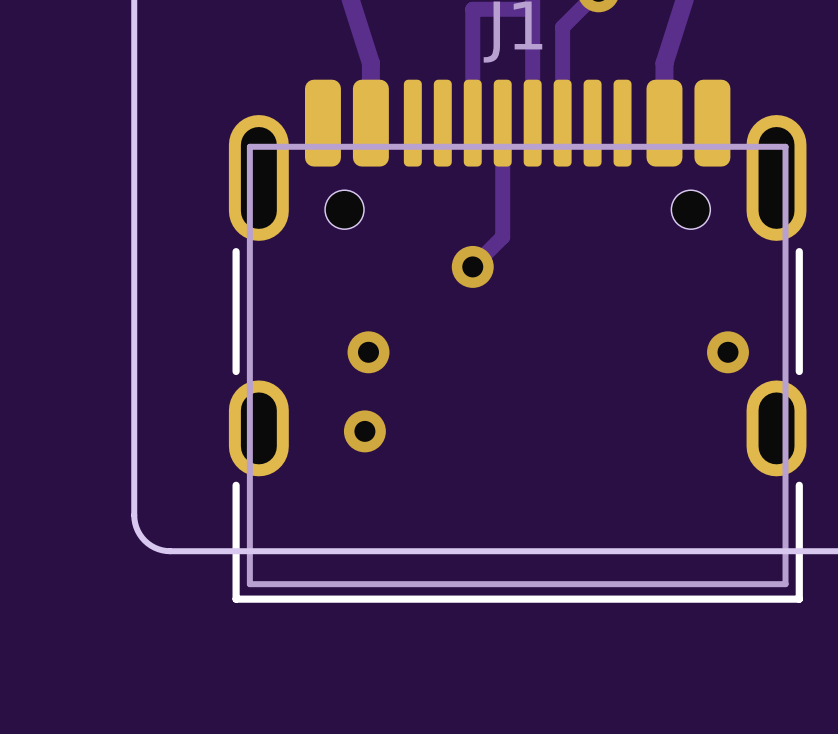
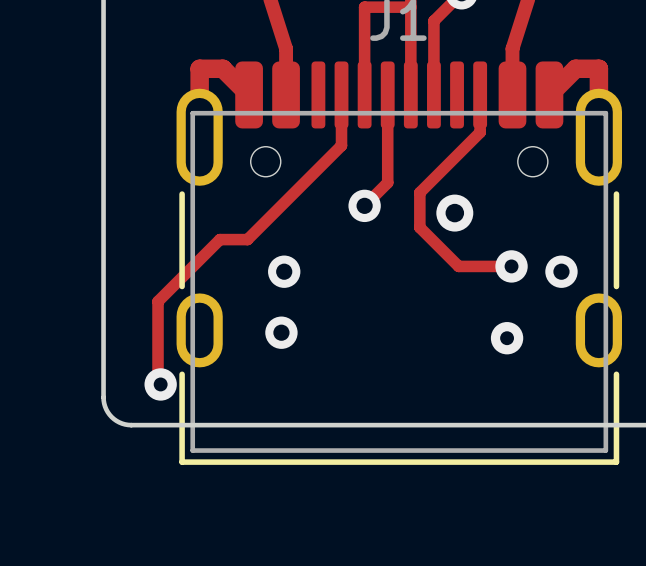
track: none -> (249, 94) (222, 68) (199, 68) (199, 137)
track: none -> (341, 94) (341, 145) (247, 239) (219, 239) (158, 301) (158, 381) (160, 384)
track: none -> (480, 94) (480, 132) (419, 192) (419, 227) (458, 266) (511, 266)
track: none -> (549, 94) (575, 68) (598, 68) (598, 137)
via: none -> (454, 213)
via: none -> (511, 266)
via: none -> (507, 338)
via: none -> (160, 384)

